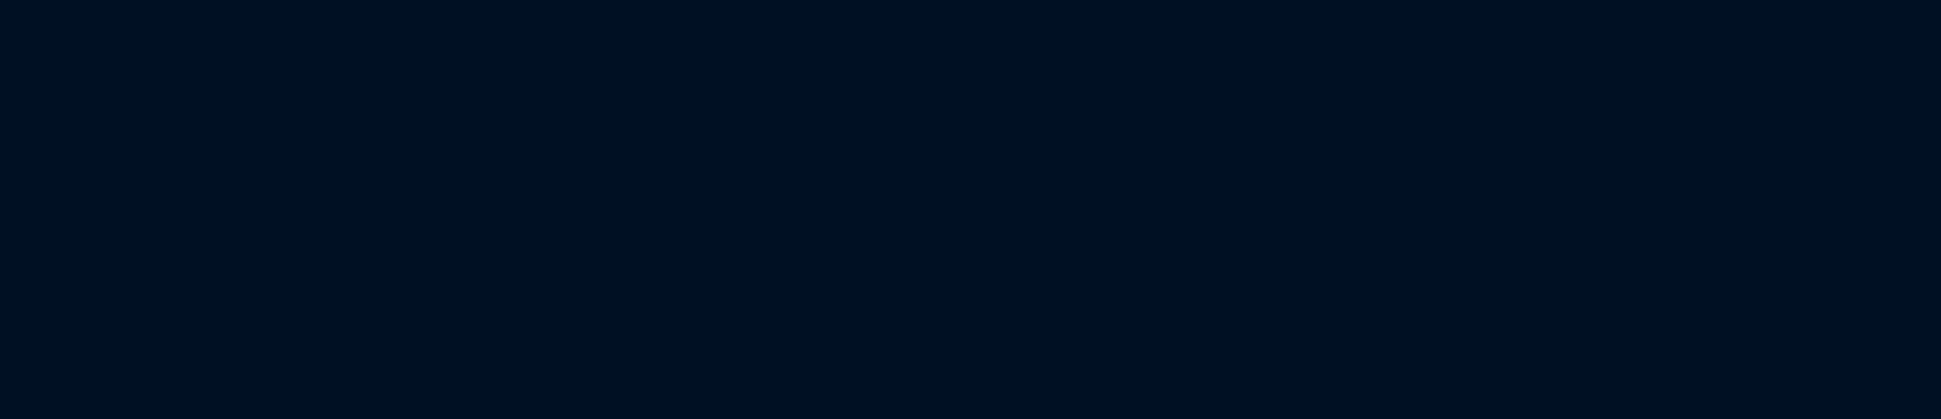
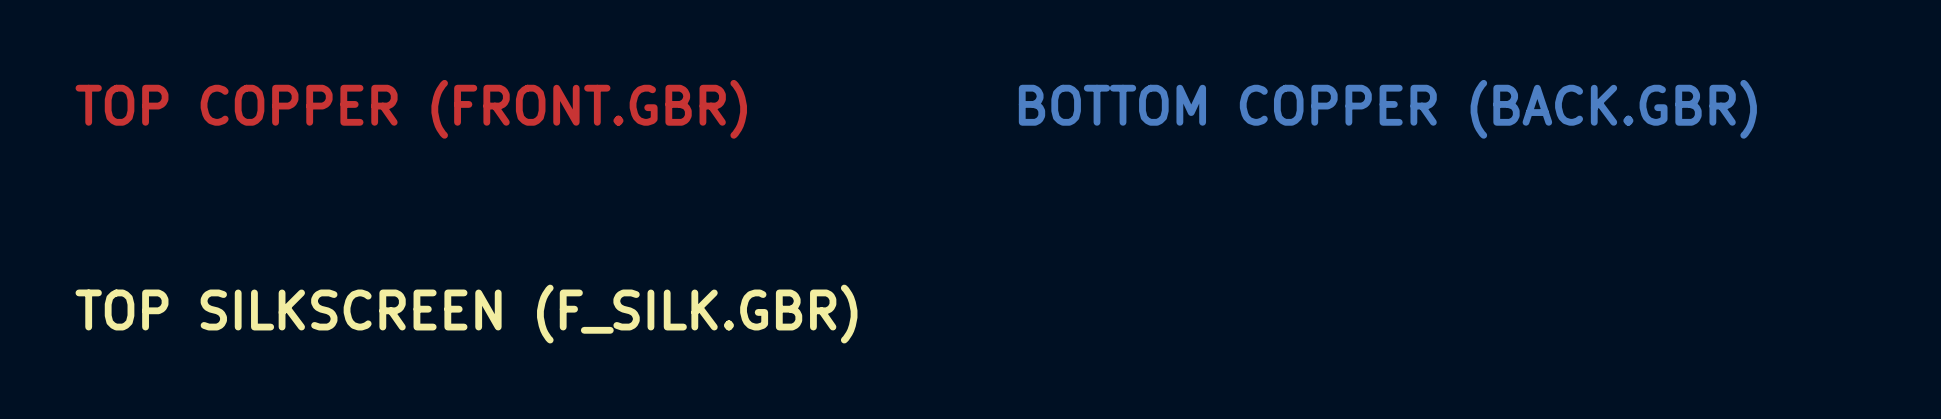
text: none -> TOP COPPER (FRONT.GBR) (411, 109)
text: none -> BOTTOM COPPER (BACK.GBR) (1387, 109)
text: none -> TOP SILKSCREEN (F_SILK.GBR) (466, 314)

